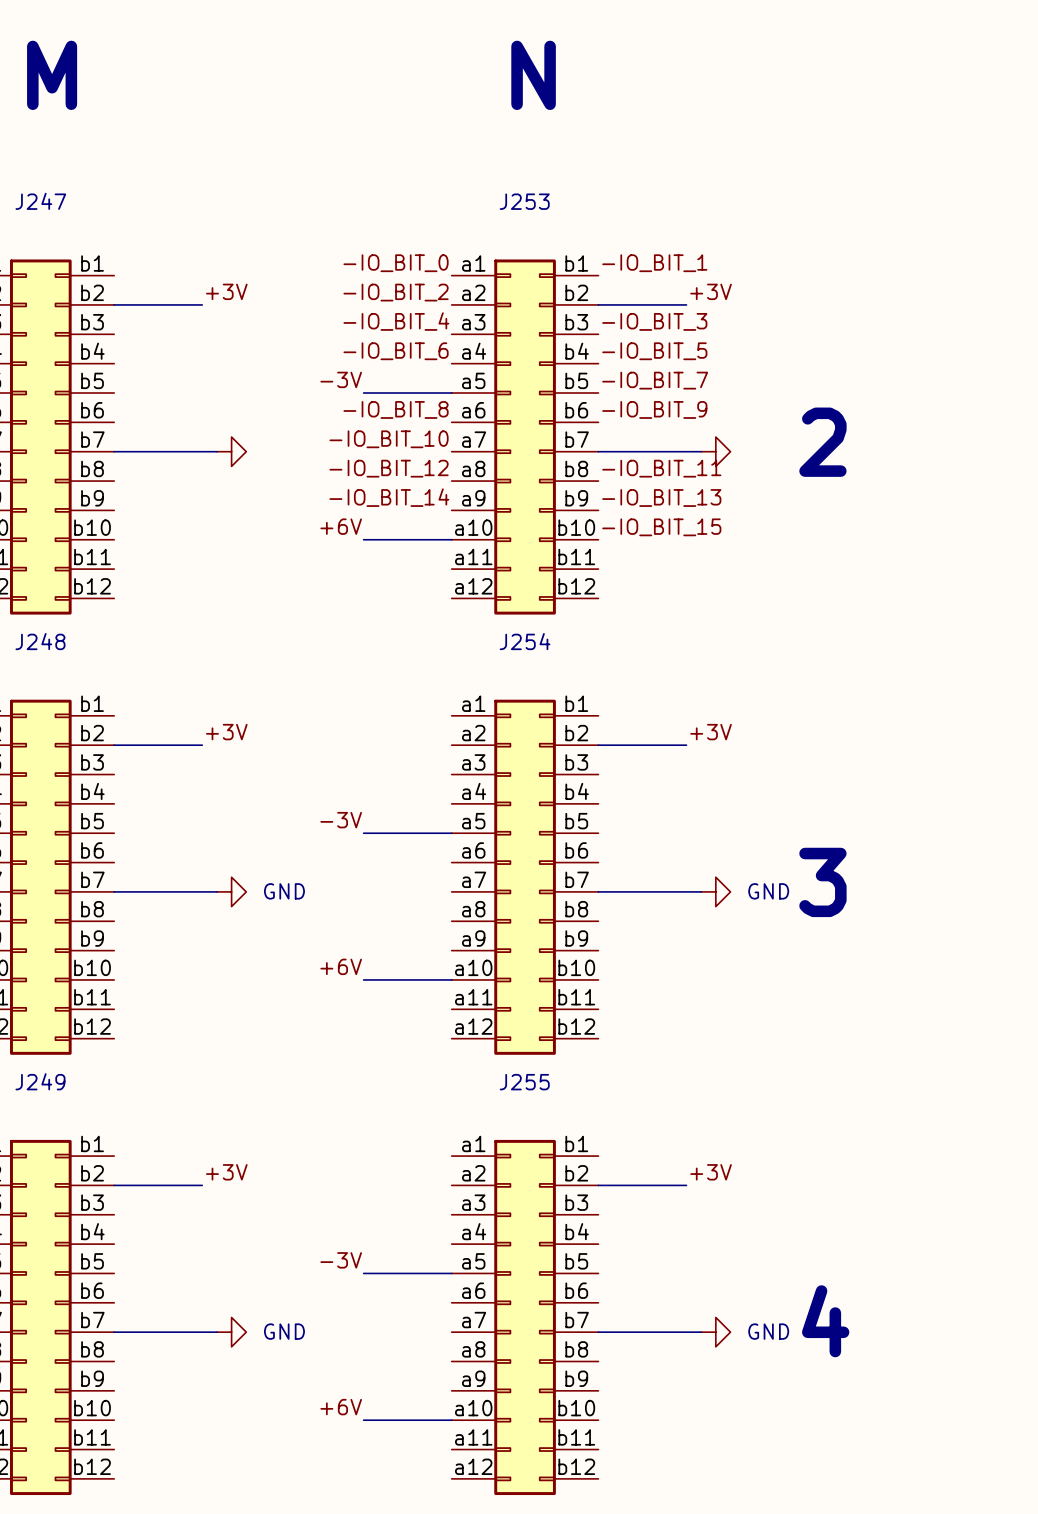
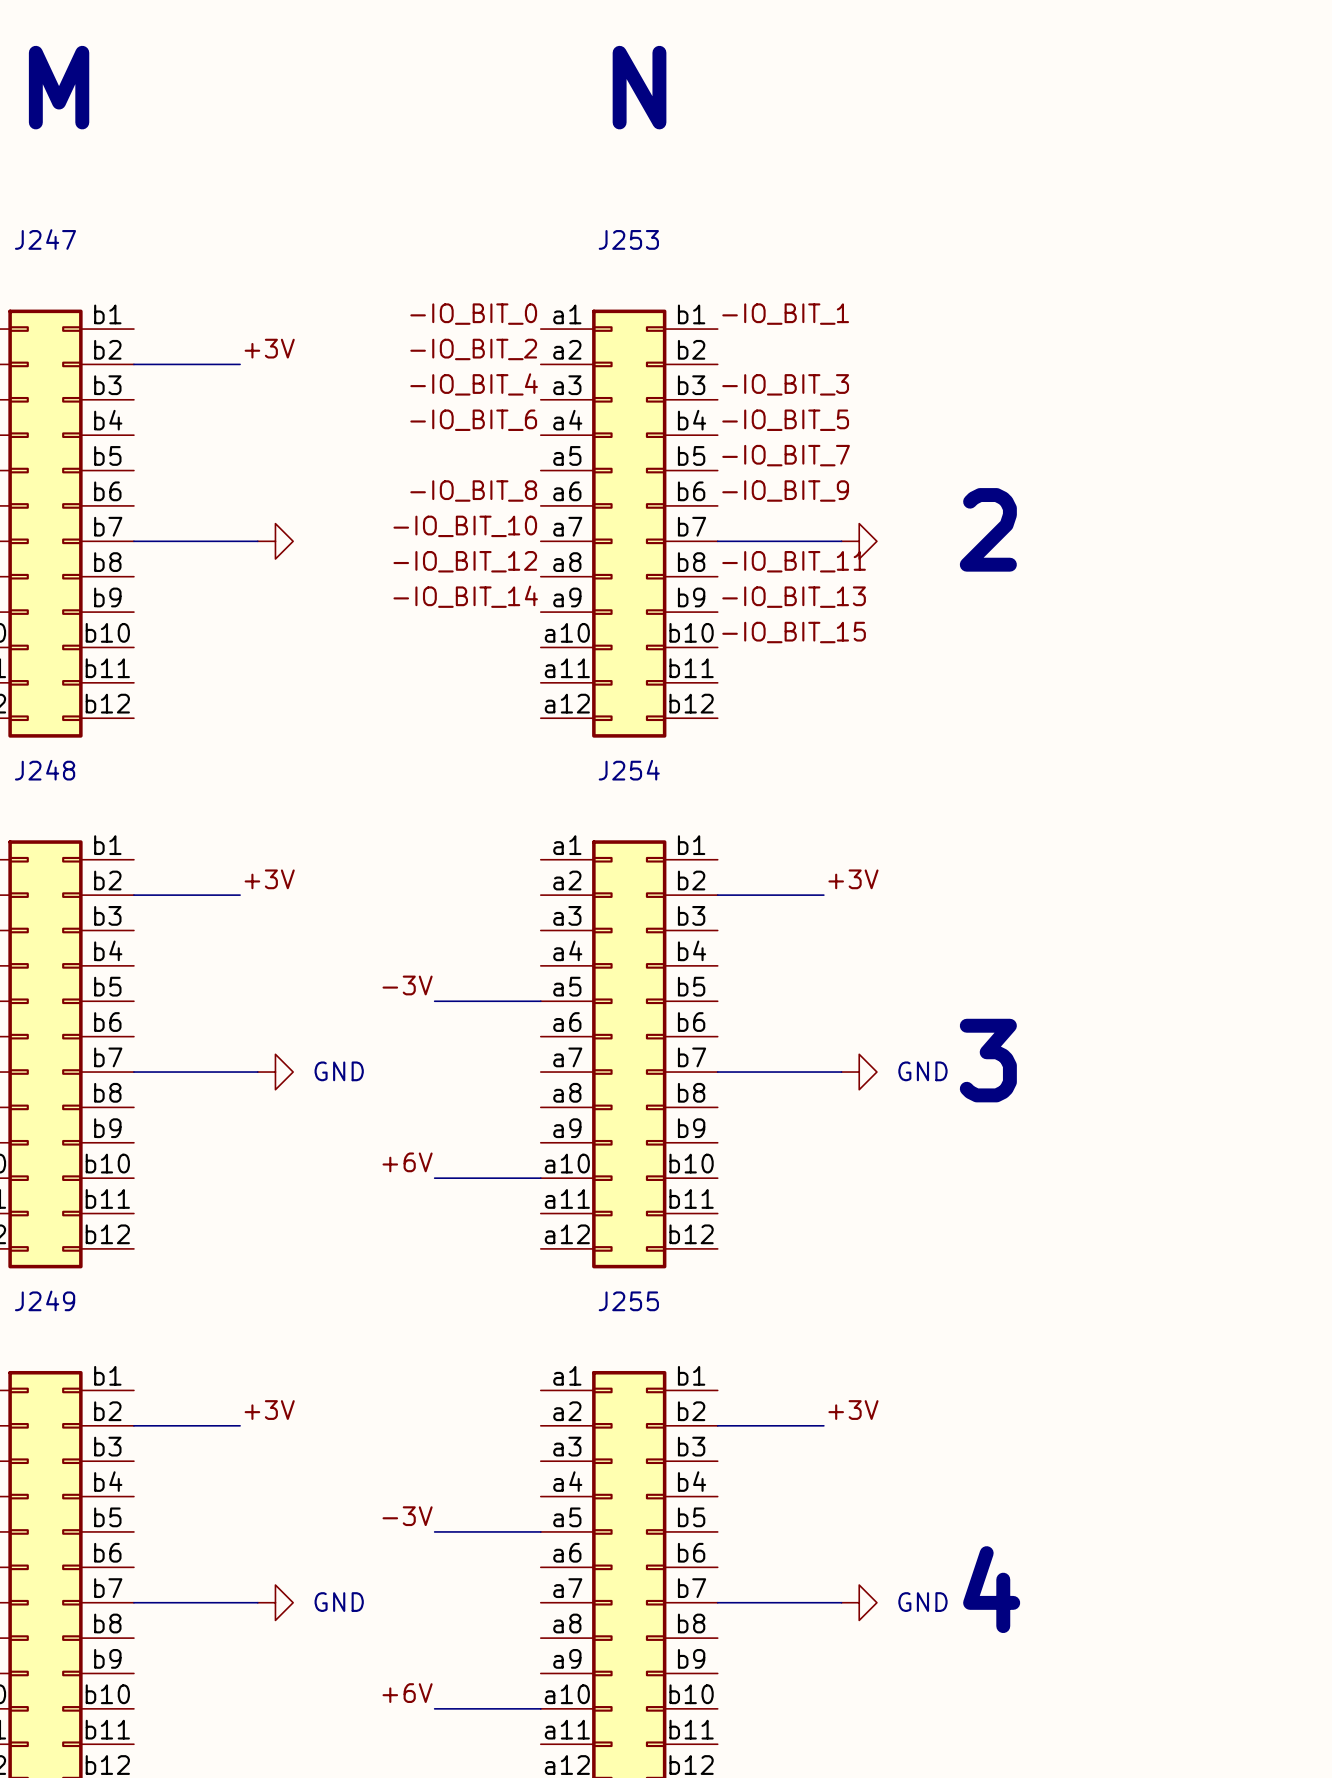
label: +3V (711, 291) -> none
wire: (598, 304) (686, 304) -> none
label: -3V (341, 379) -> none
wire: (363, 393) (451, 393) -> none
label: +6V (341, 526) -> none
wire: (363, 539) (451, 539) -> none

